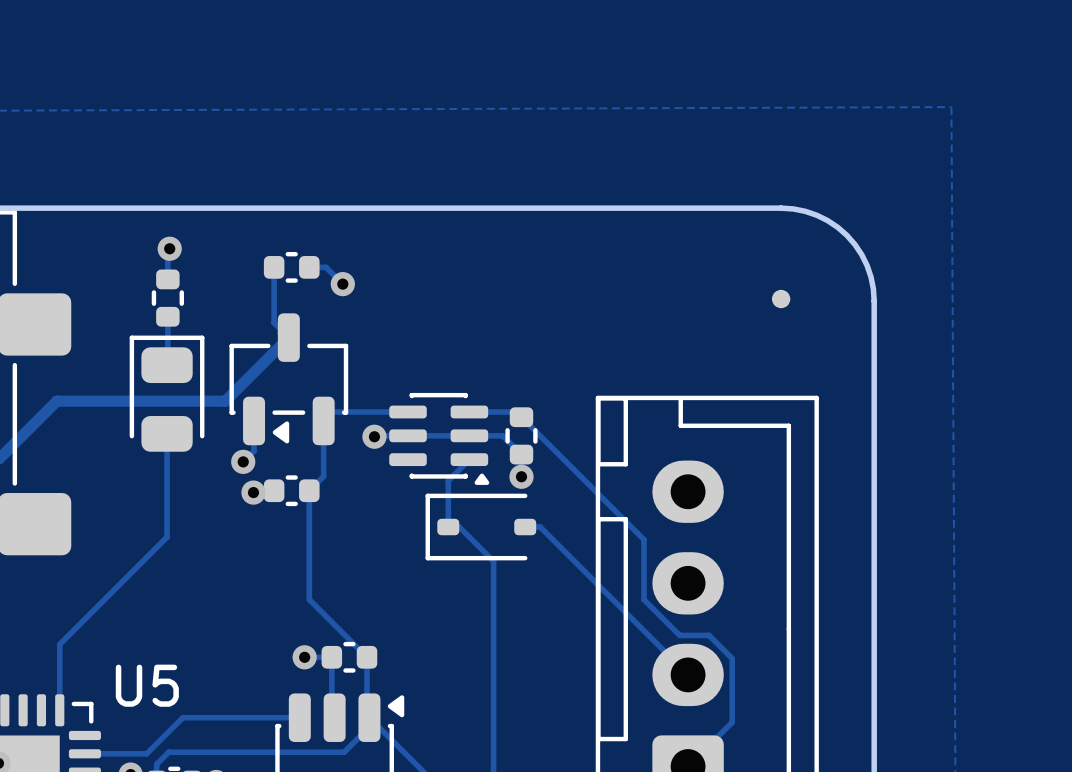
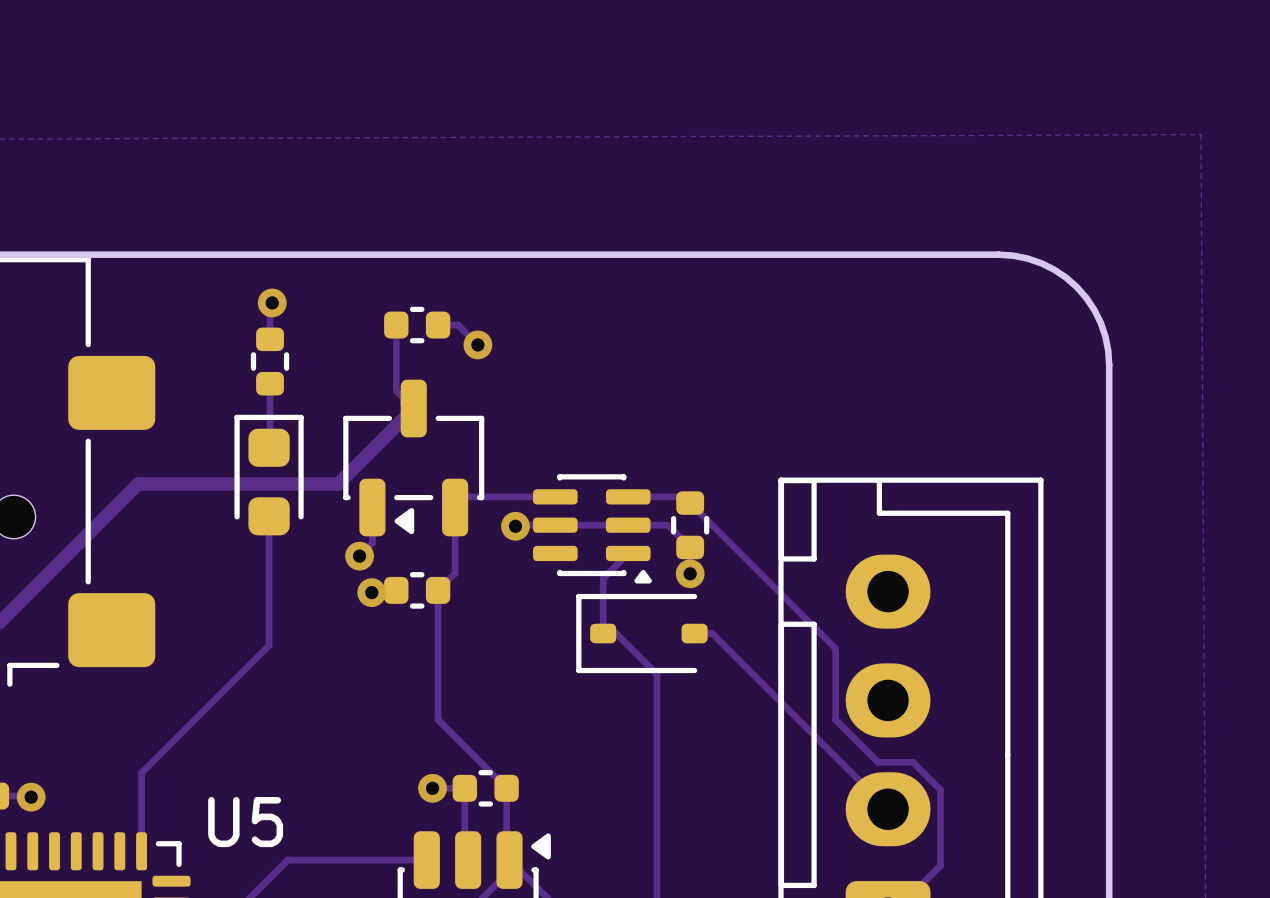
part: (781, 299) -> none
part footprint: [129, 335, 205, 452] -> [234, 414, 304, 536]

